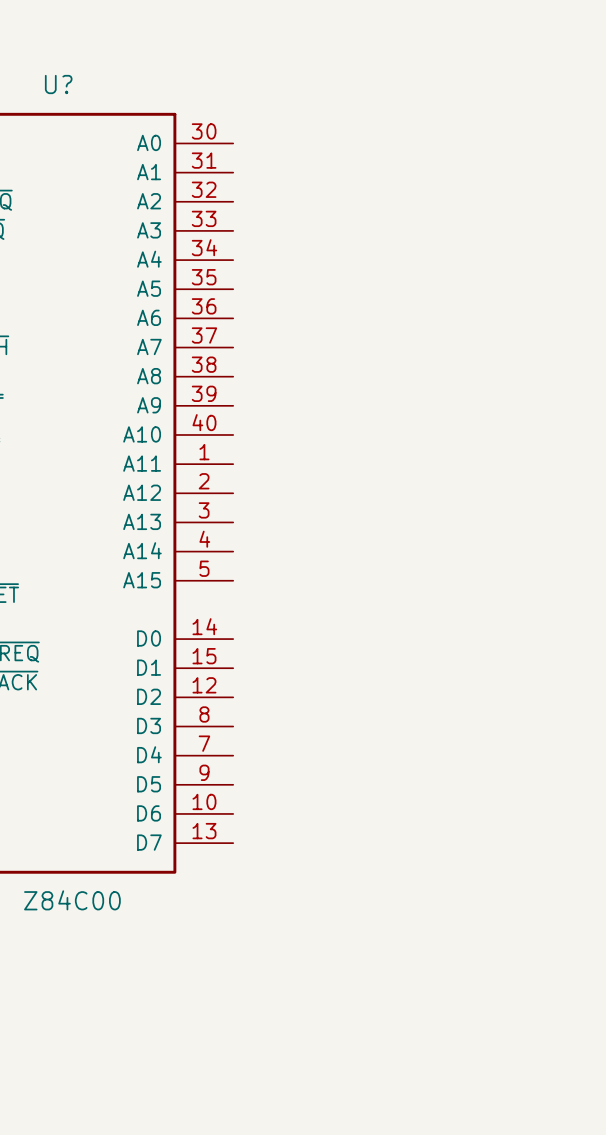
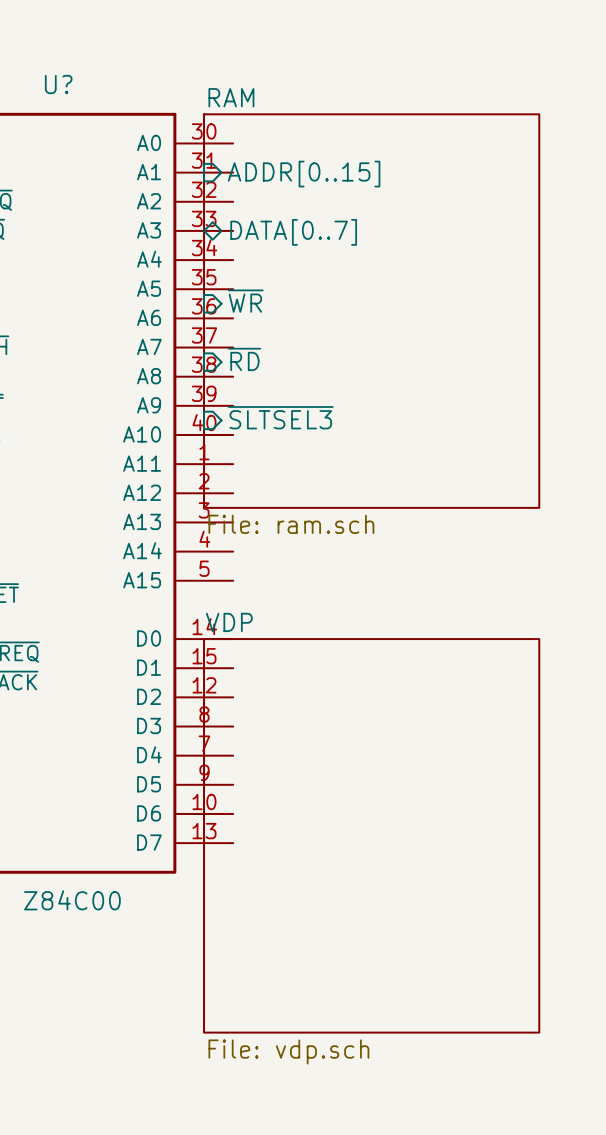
sheet pin: none -> ADDR[0..15] (304, 174)
sheet pin: none -> DATA[0..7] (293, 232)
sheet pin: none -> ~{WR} (245, 301)
sheet RAM: none -> File: ram.sch (371, 311)
sheet pin: none -> ~{RD} (244, 359)
sheet pin: none -> ~{SLTSEL3} (280, 417)
sheet VDP: none -> File: vdp.sch (371, 835)

